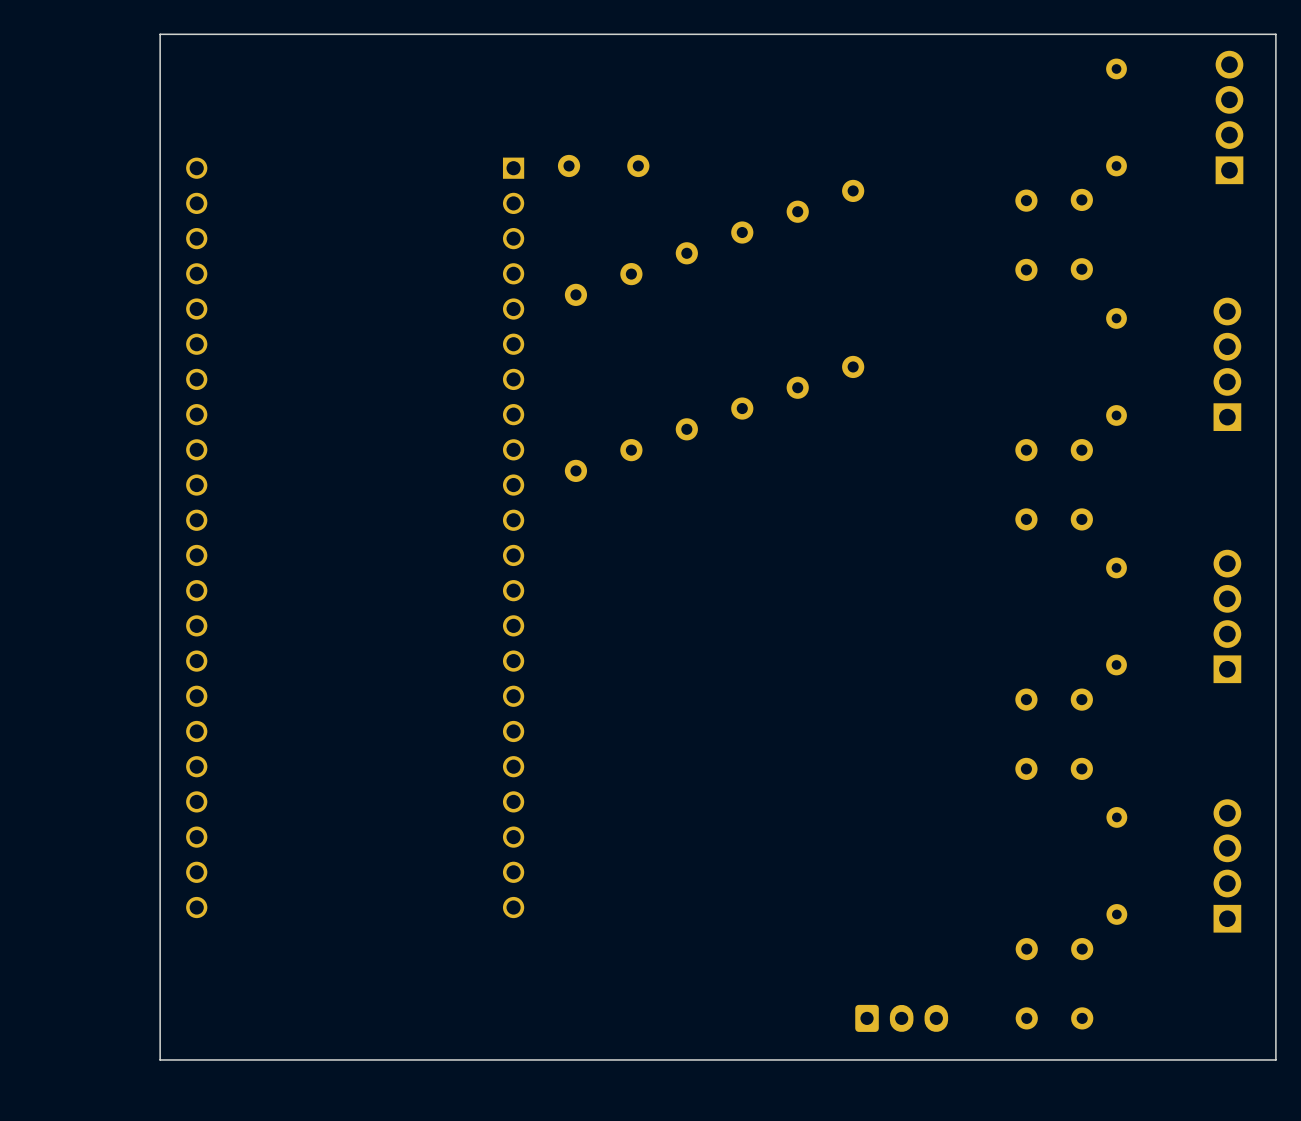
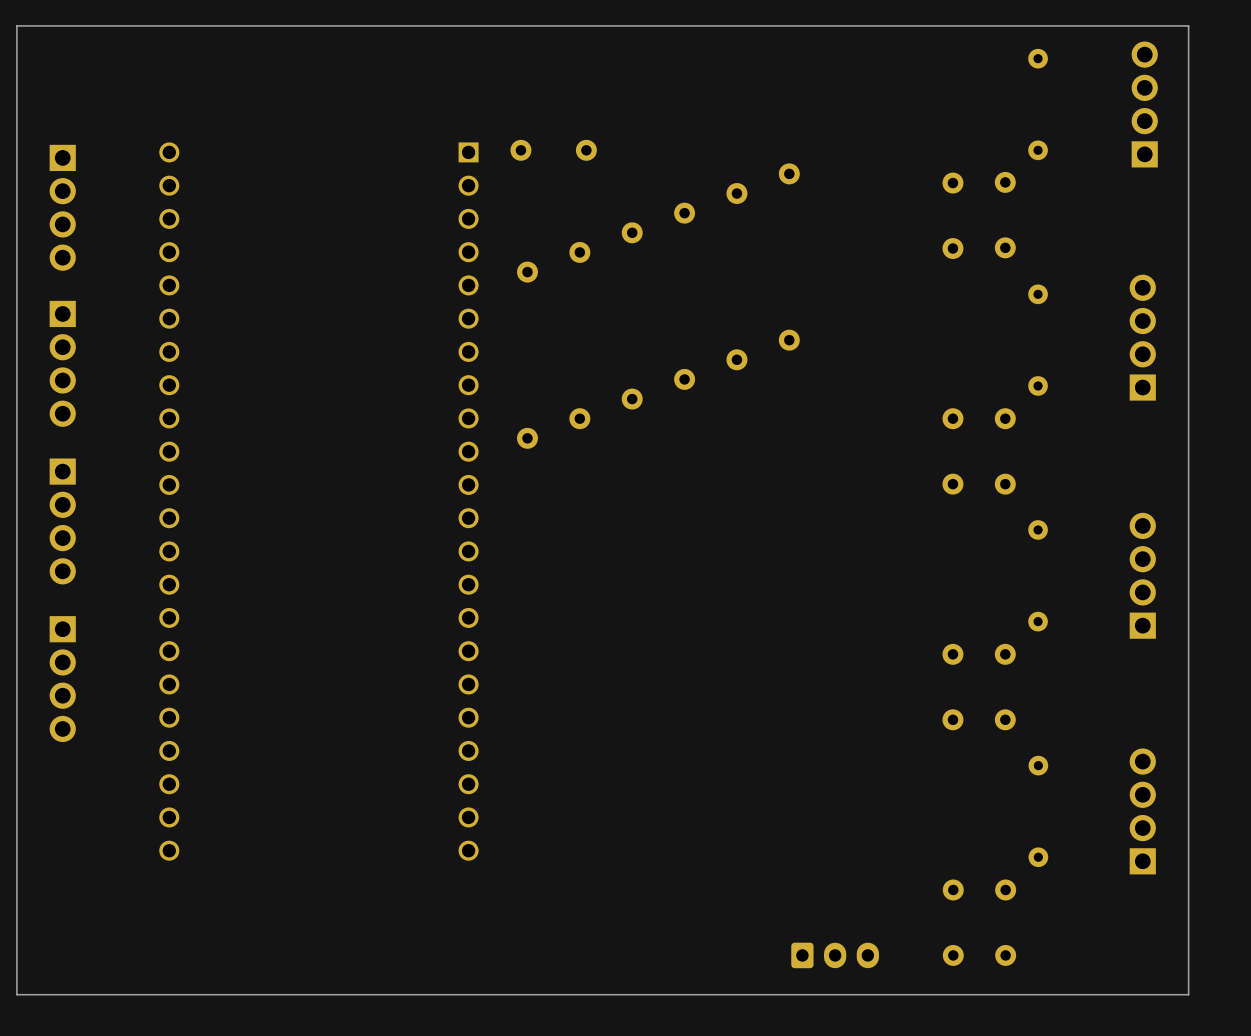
board edge: (160, 34) (160, 1059) -> (134, 25) (16, 25) (16, 994) (134, 994)
part: none -> (62, 207)
part: none -> (62, 363)
part: none -> (62, 521)
part: none -> (62, 679)

